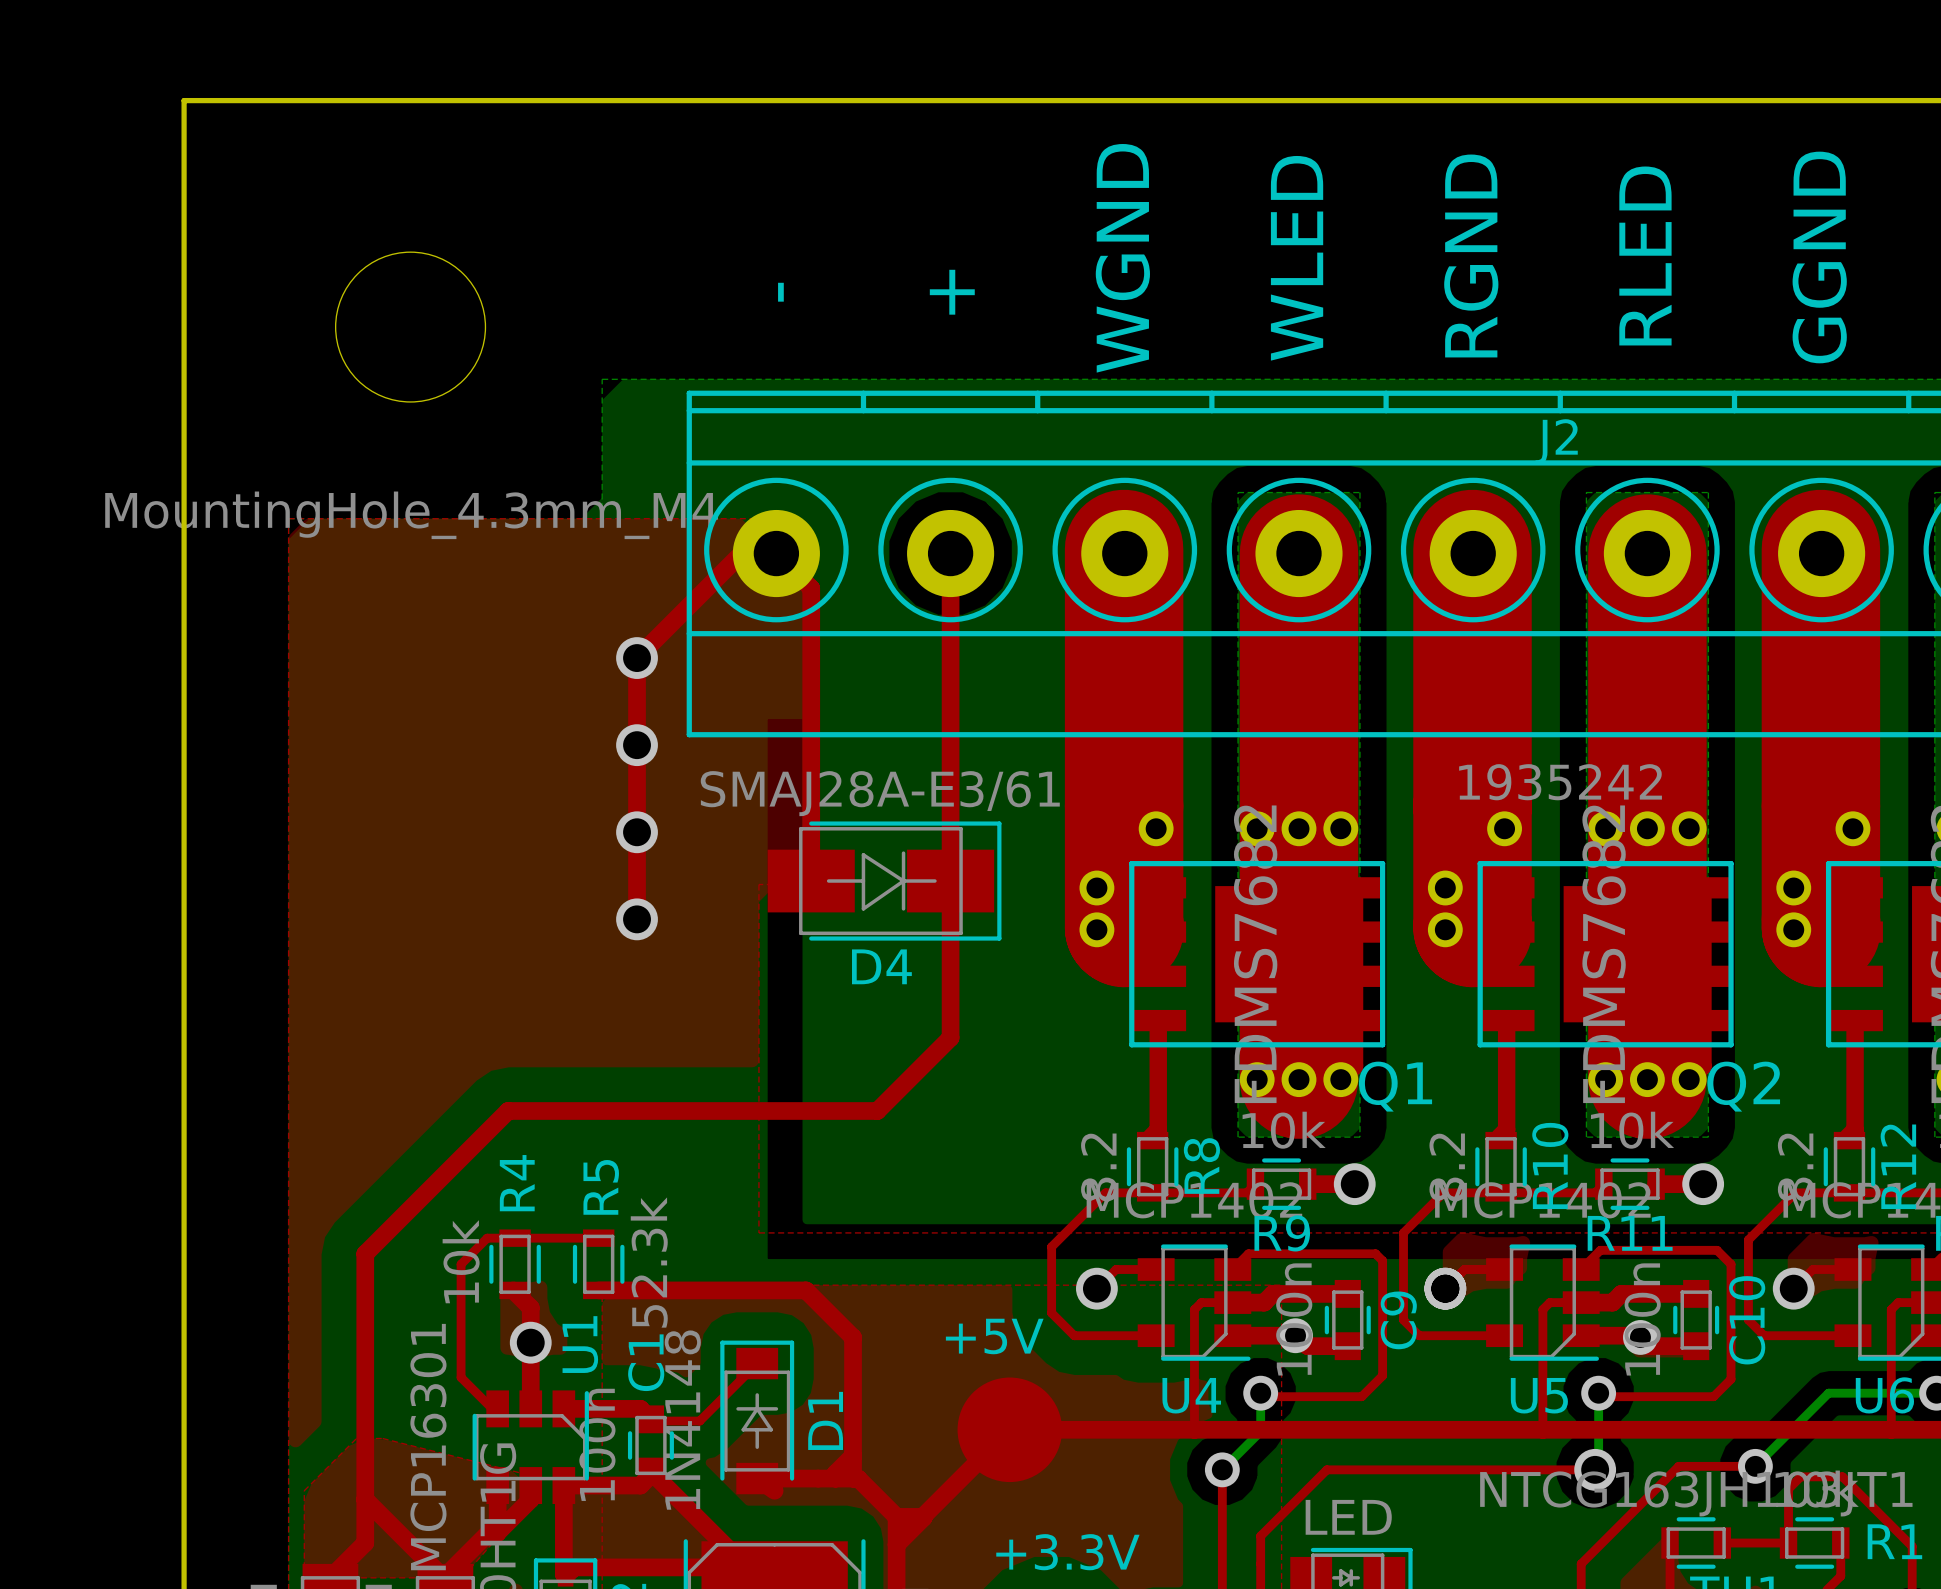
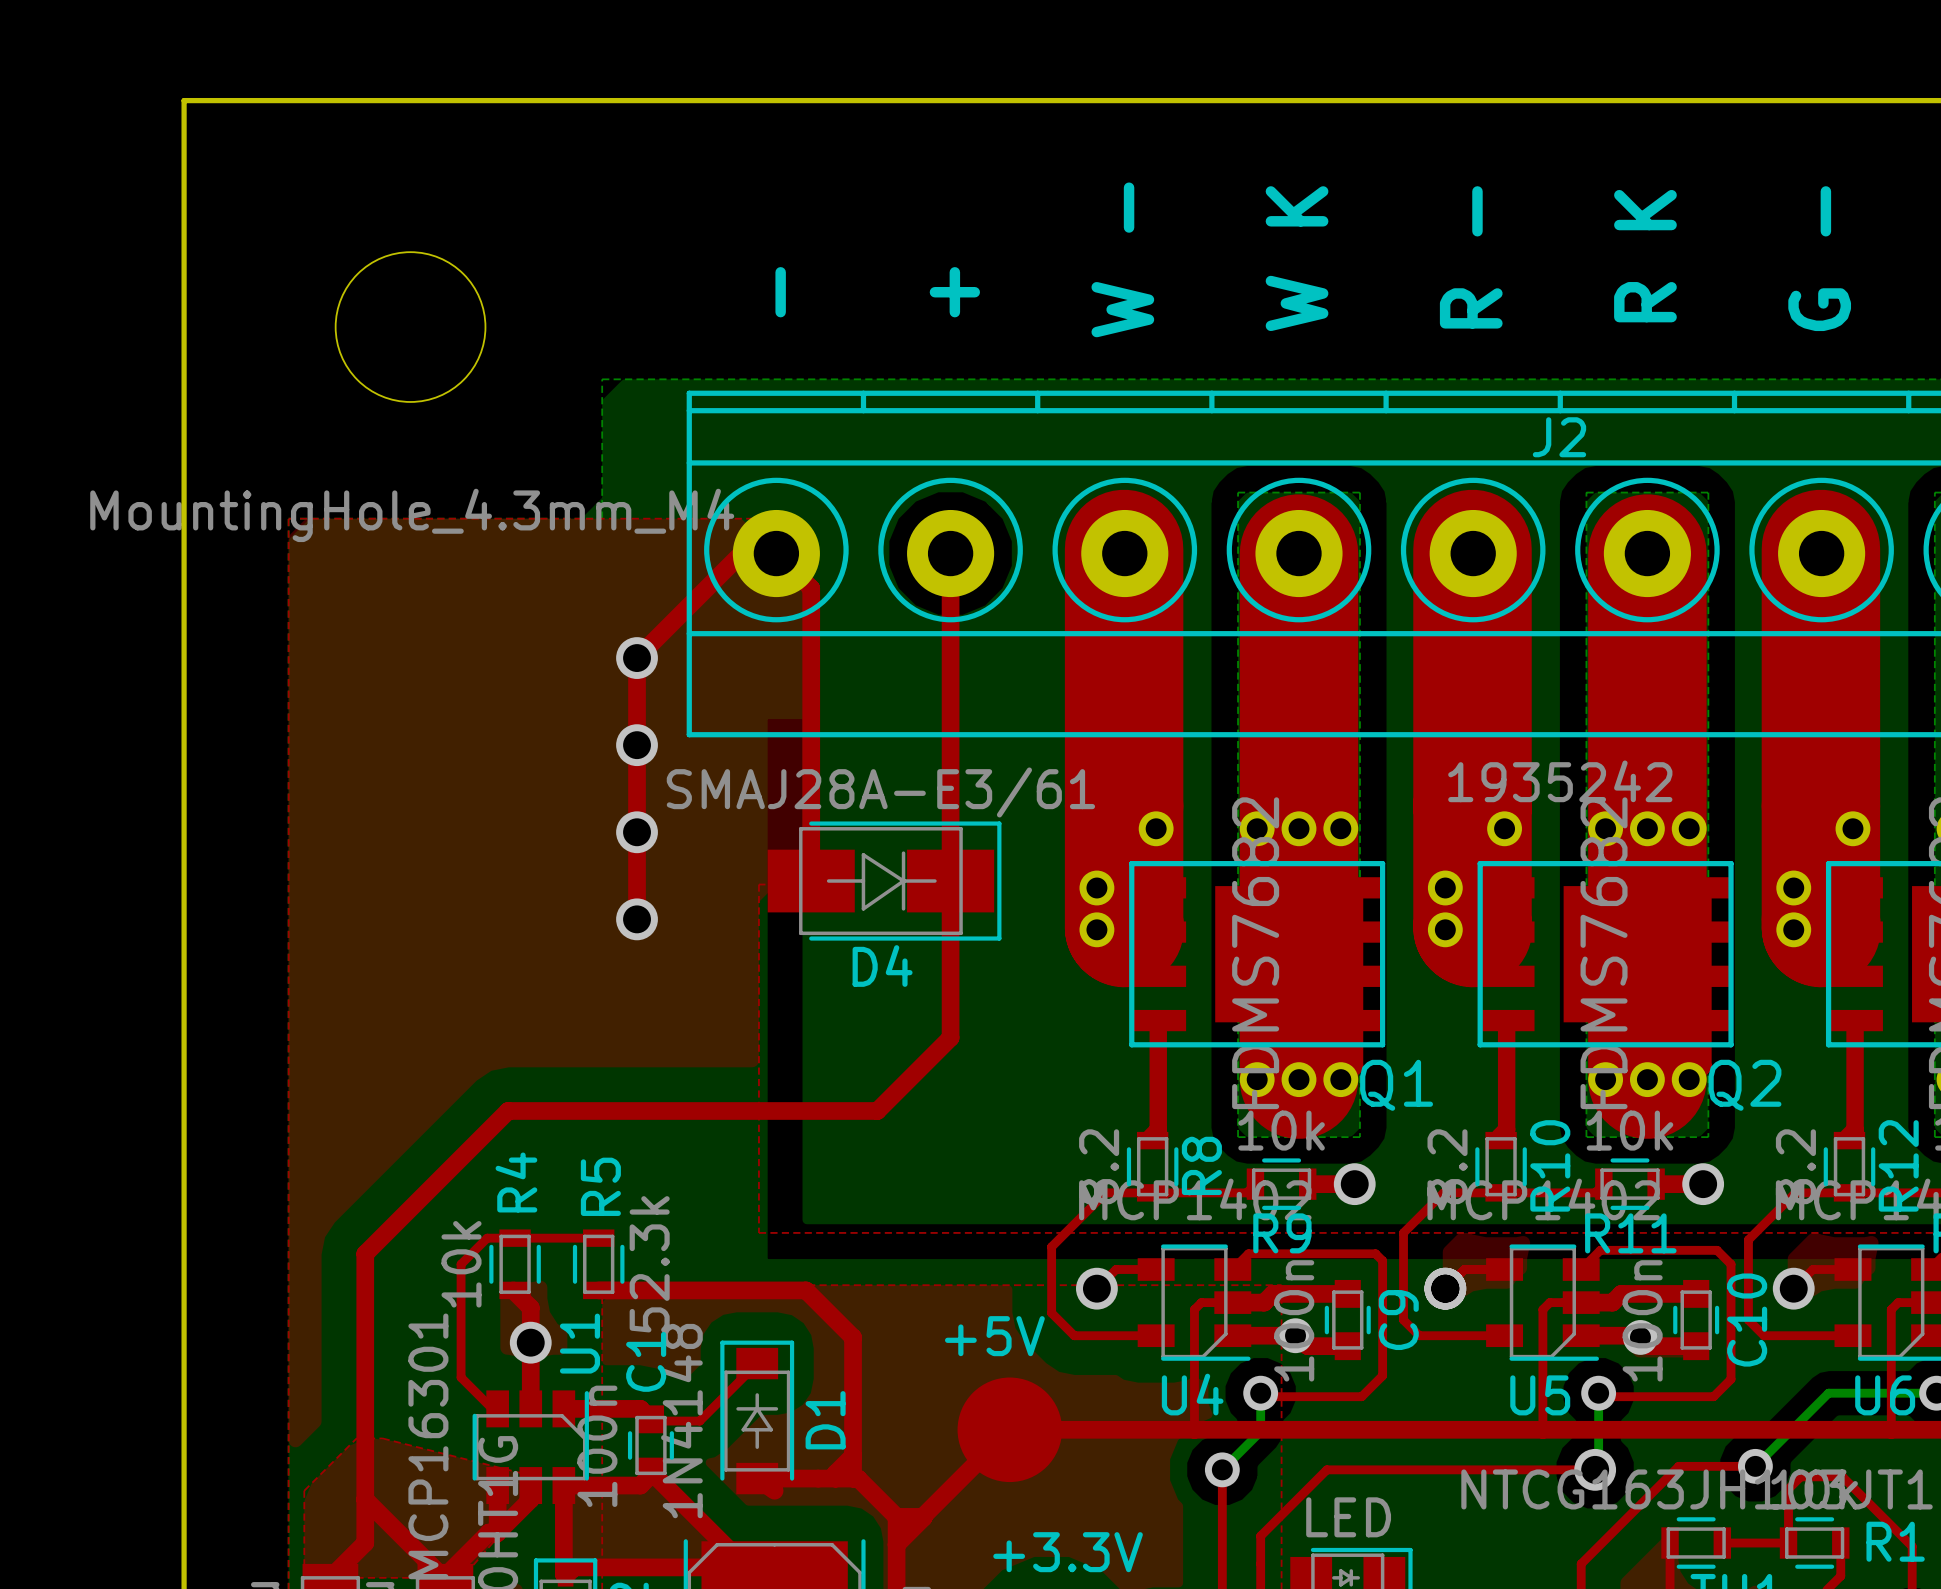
text: RGND (1471, 255) -> R - (1471, 257)
text: RLED (1645, 255) -> R K (1645, 256)
text: GGND (1819, 257) -> G - (1819, 258)
text: WGND (1122, 258) -> W - (1122, 259)
text: WLED (1297, 258) -> W K (1297, 258)

